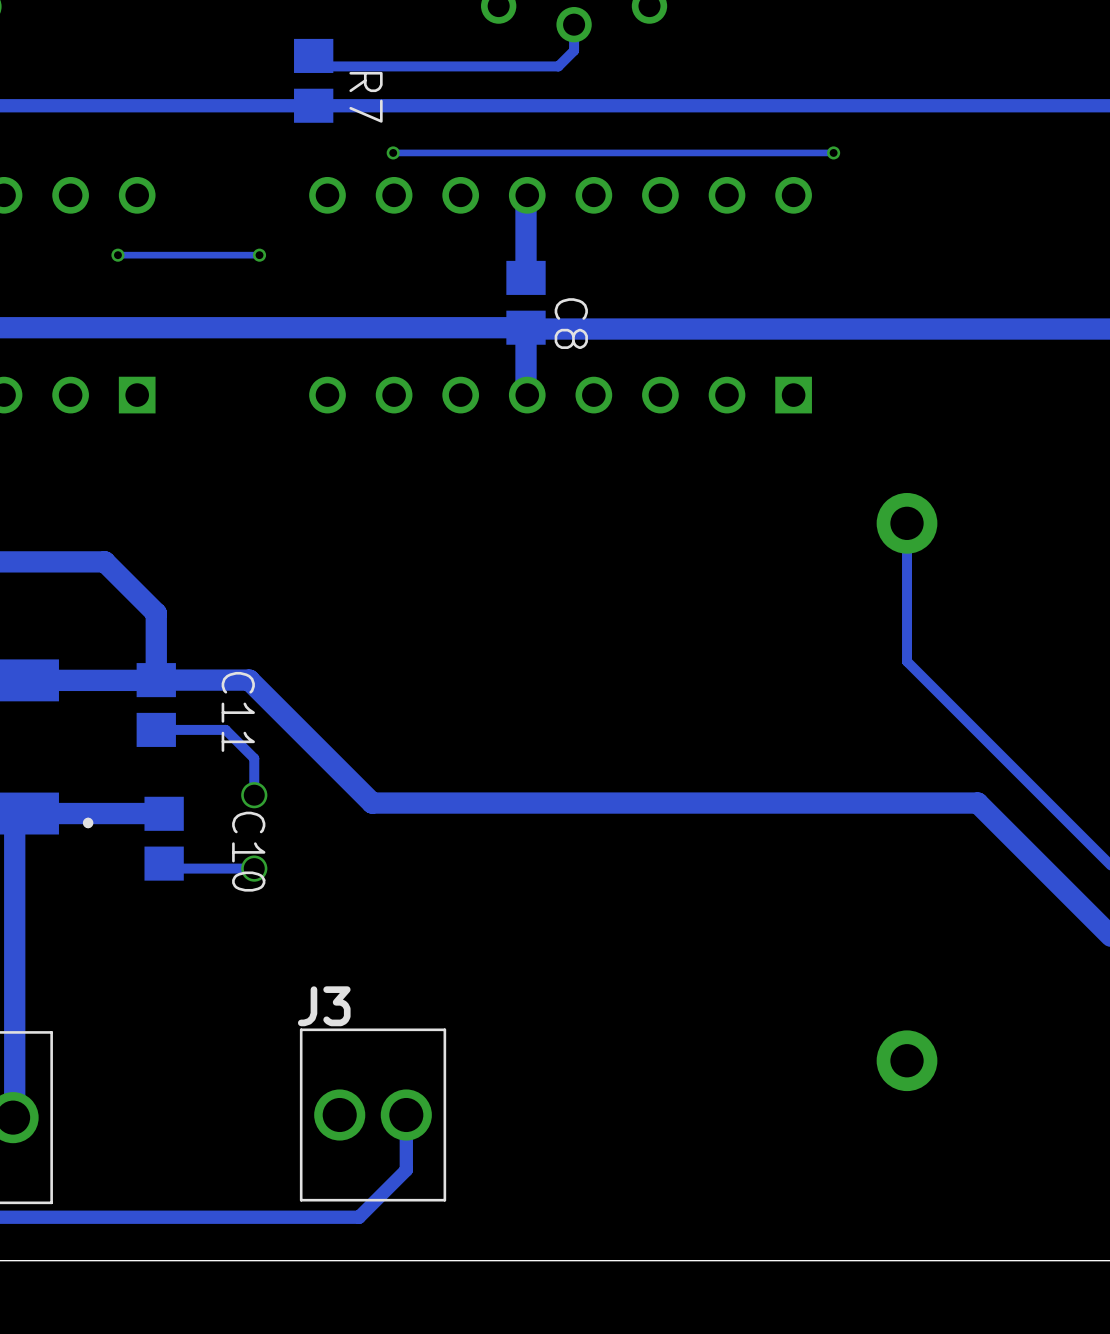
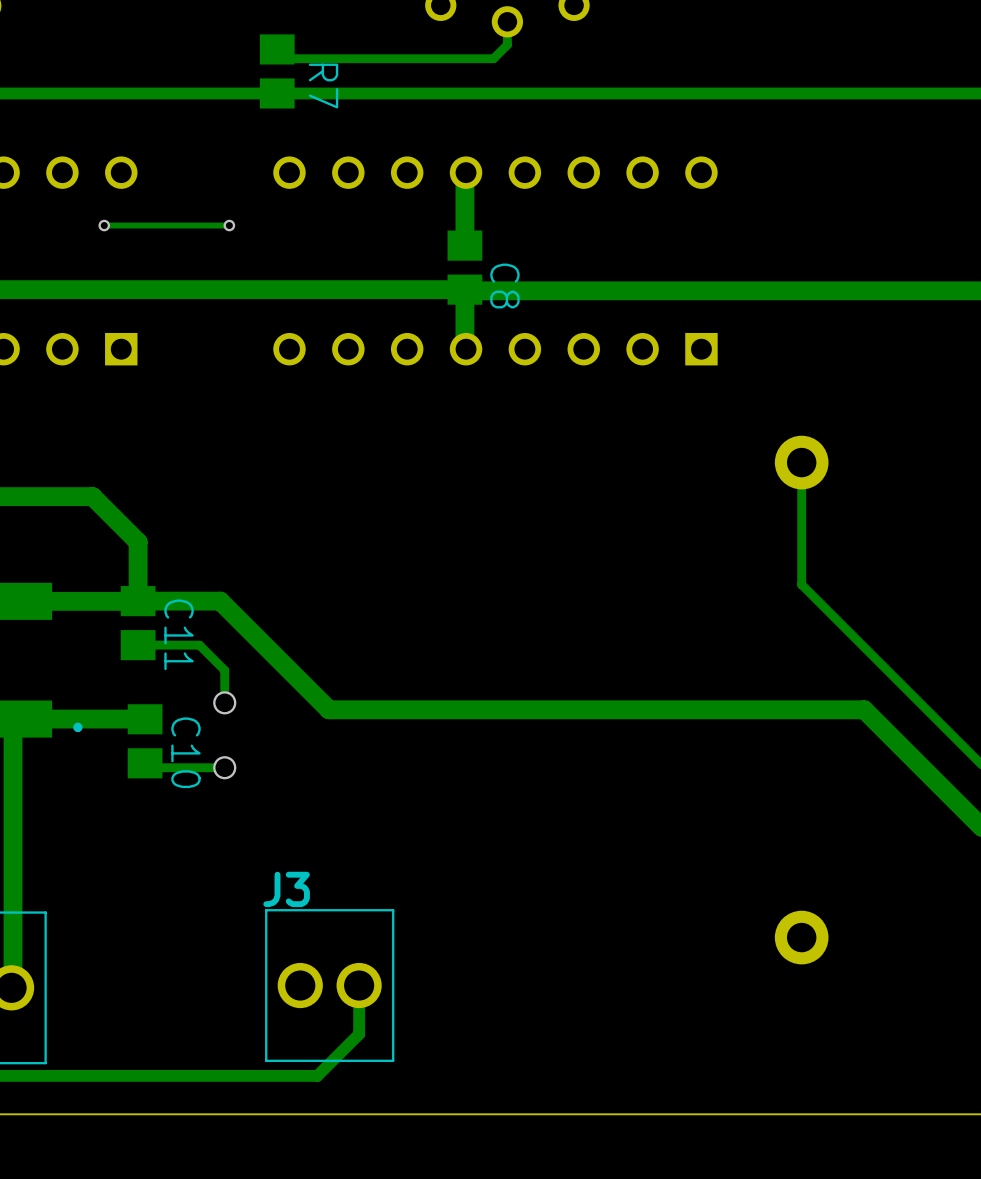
via: (393, 152) -> none
track: (833, 152) (393, 152) -> none
via: (833, 152) -> none
C11 name position: C11 (238, 711) -> C11 (179, 634)
C10 name position: C10 (248, 851) -> C10 (185, 752)

